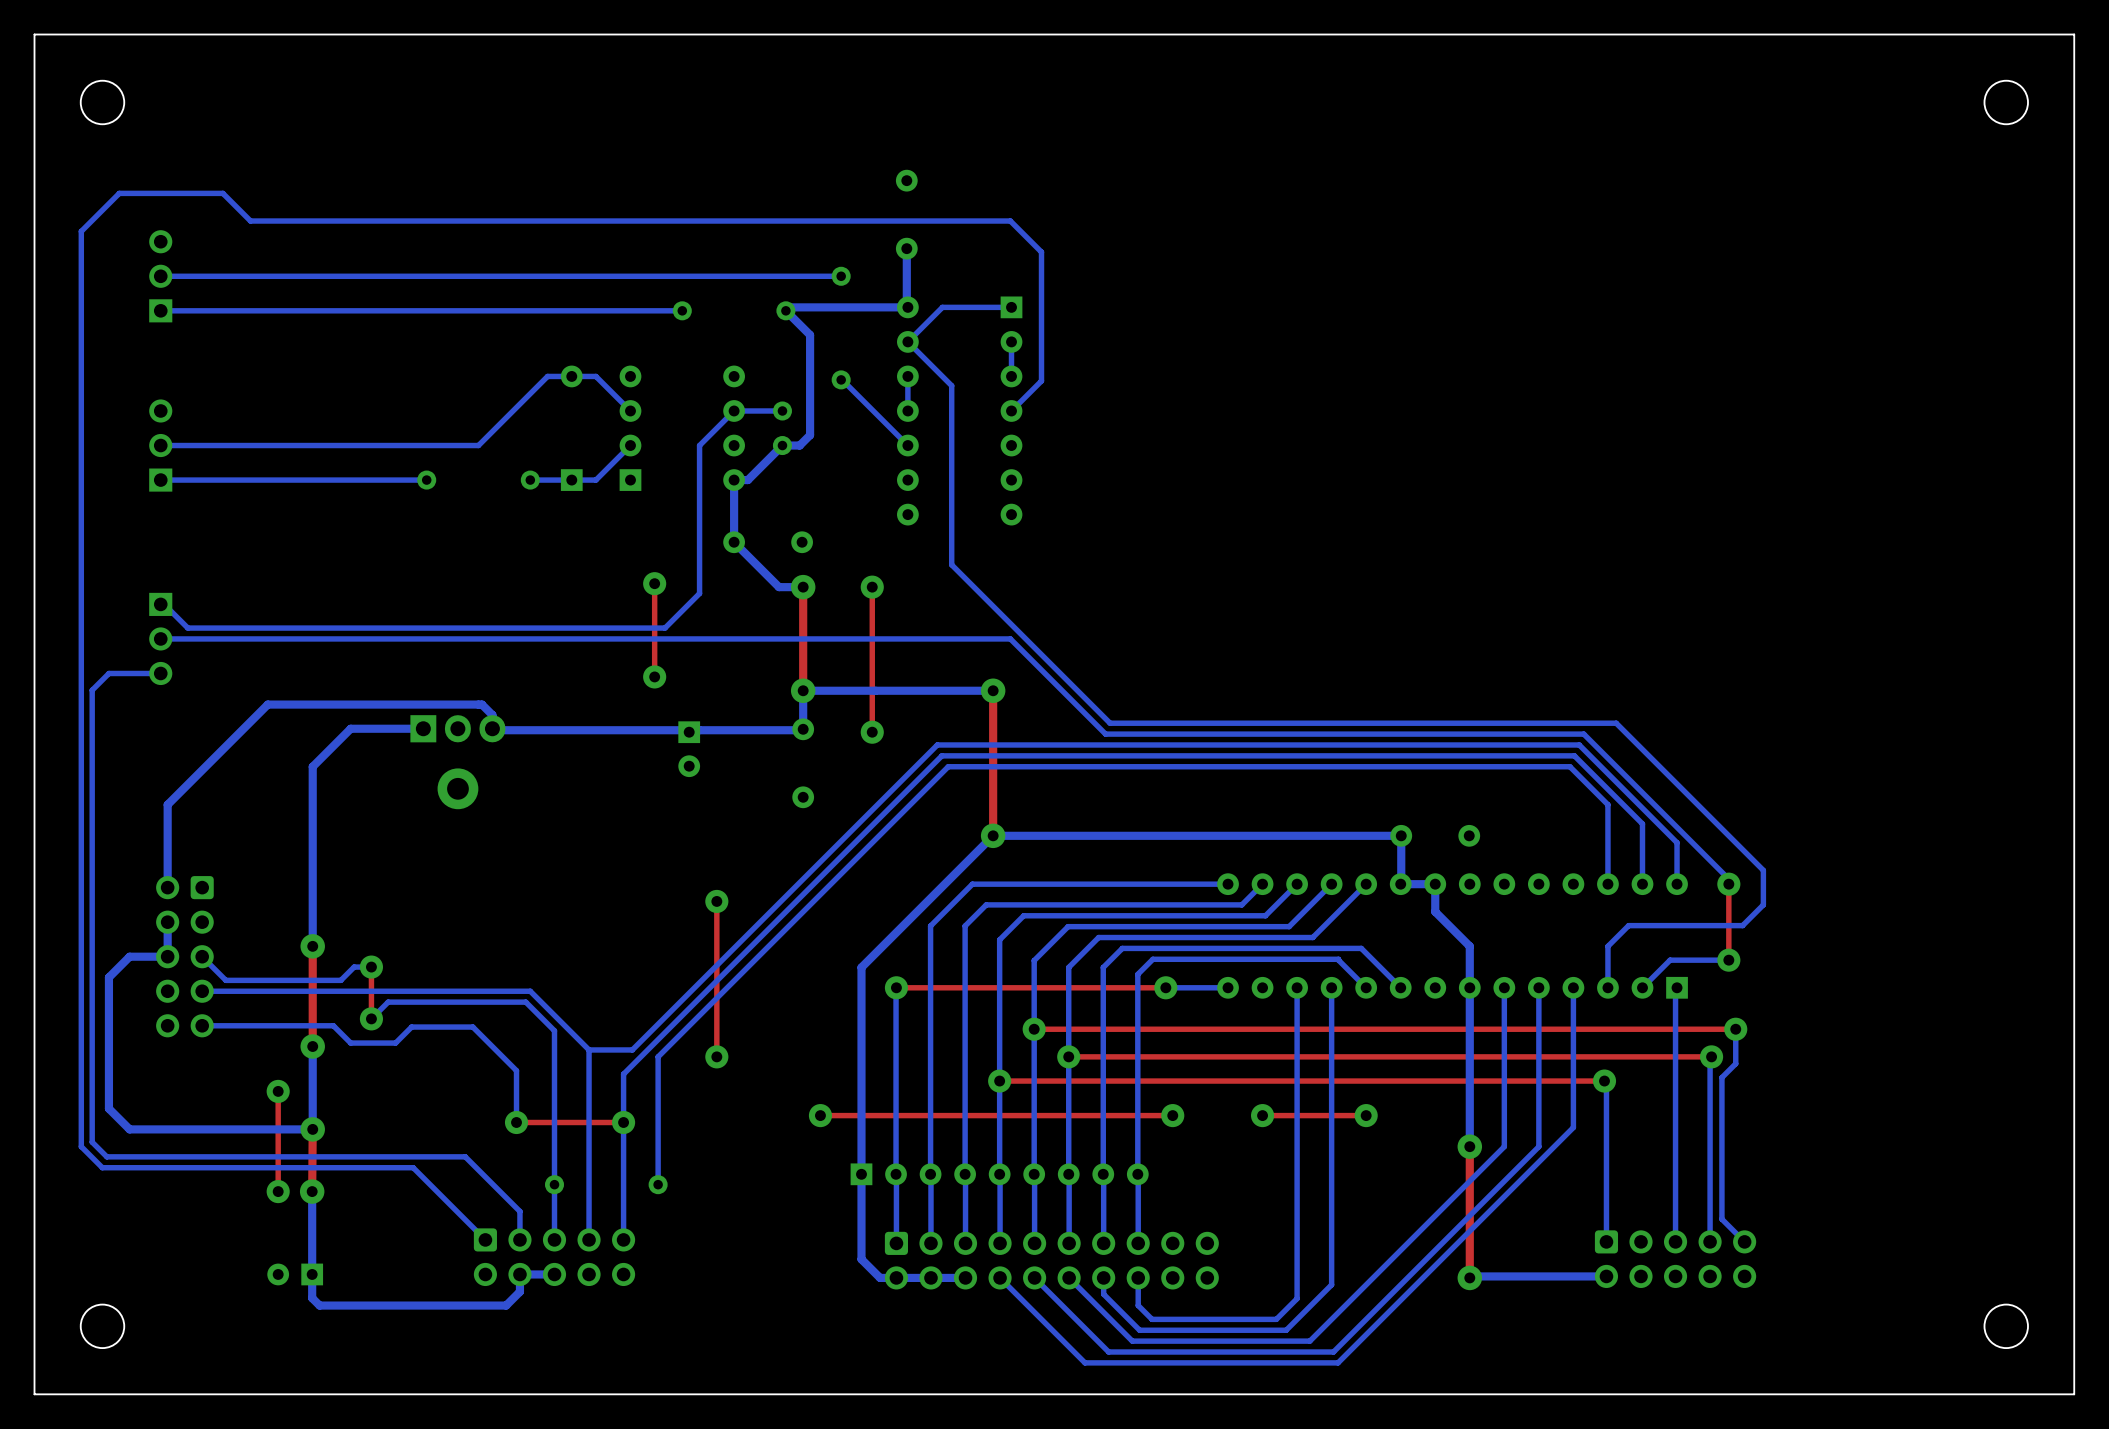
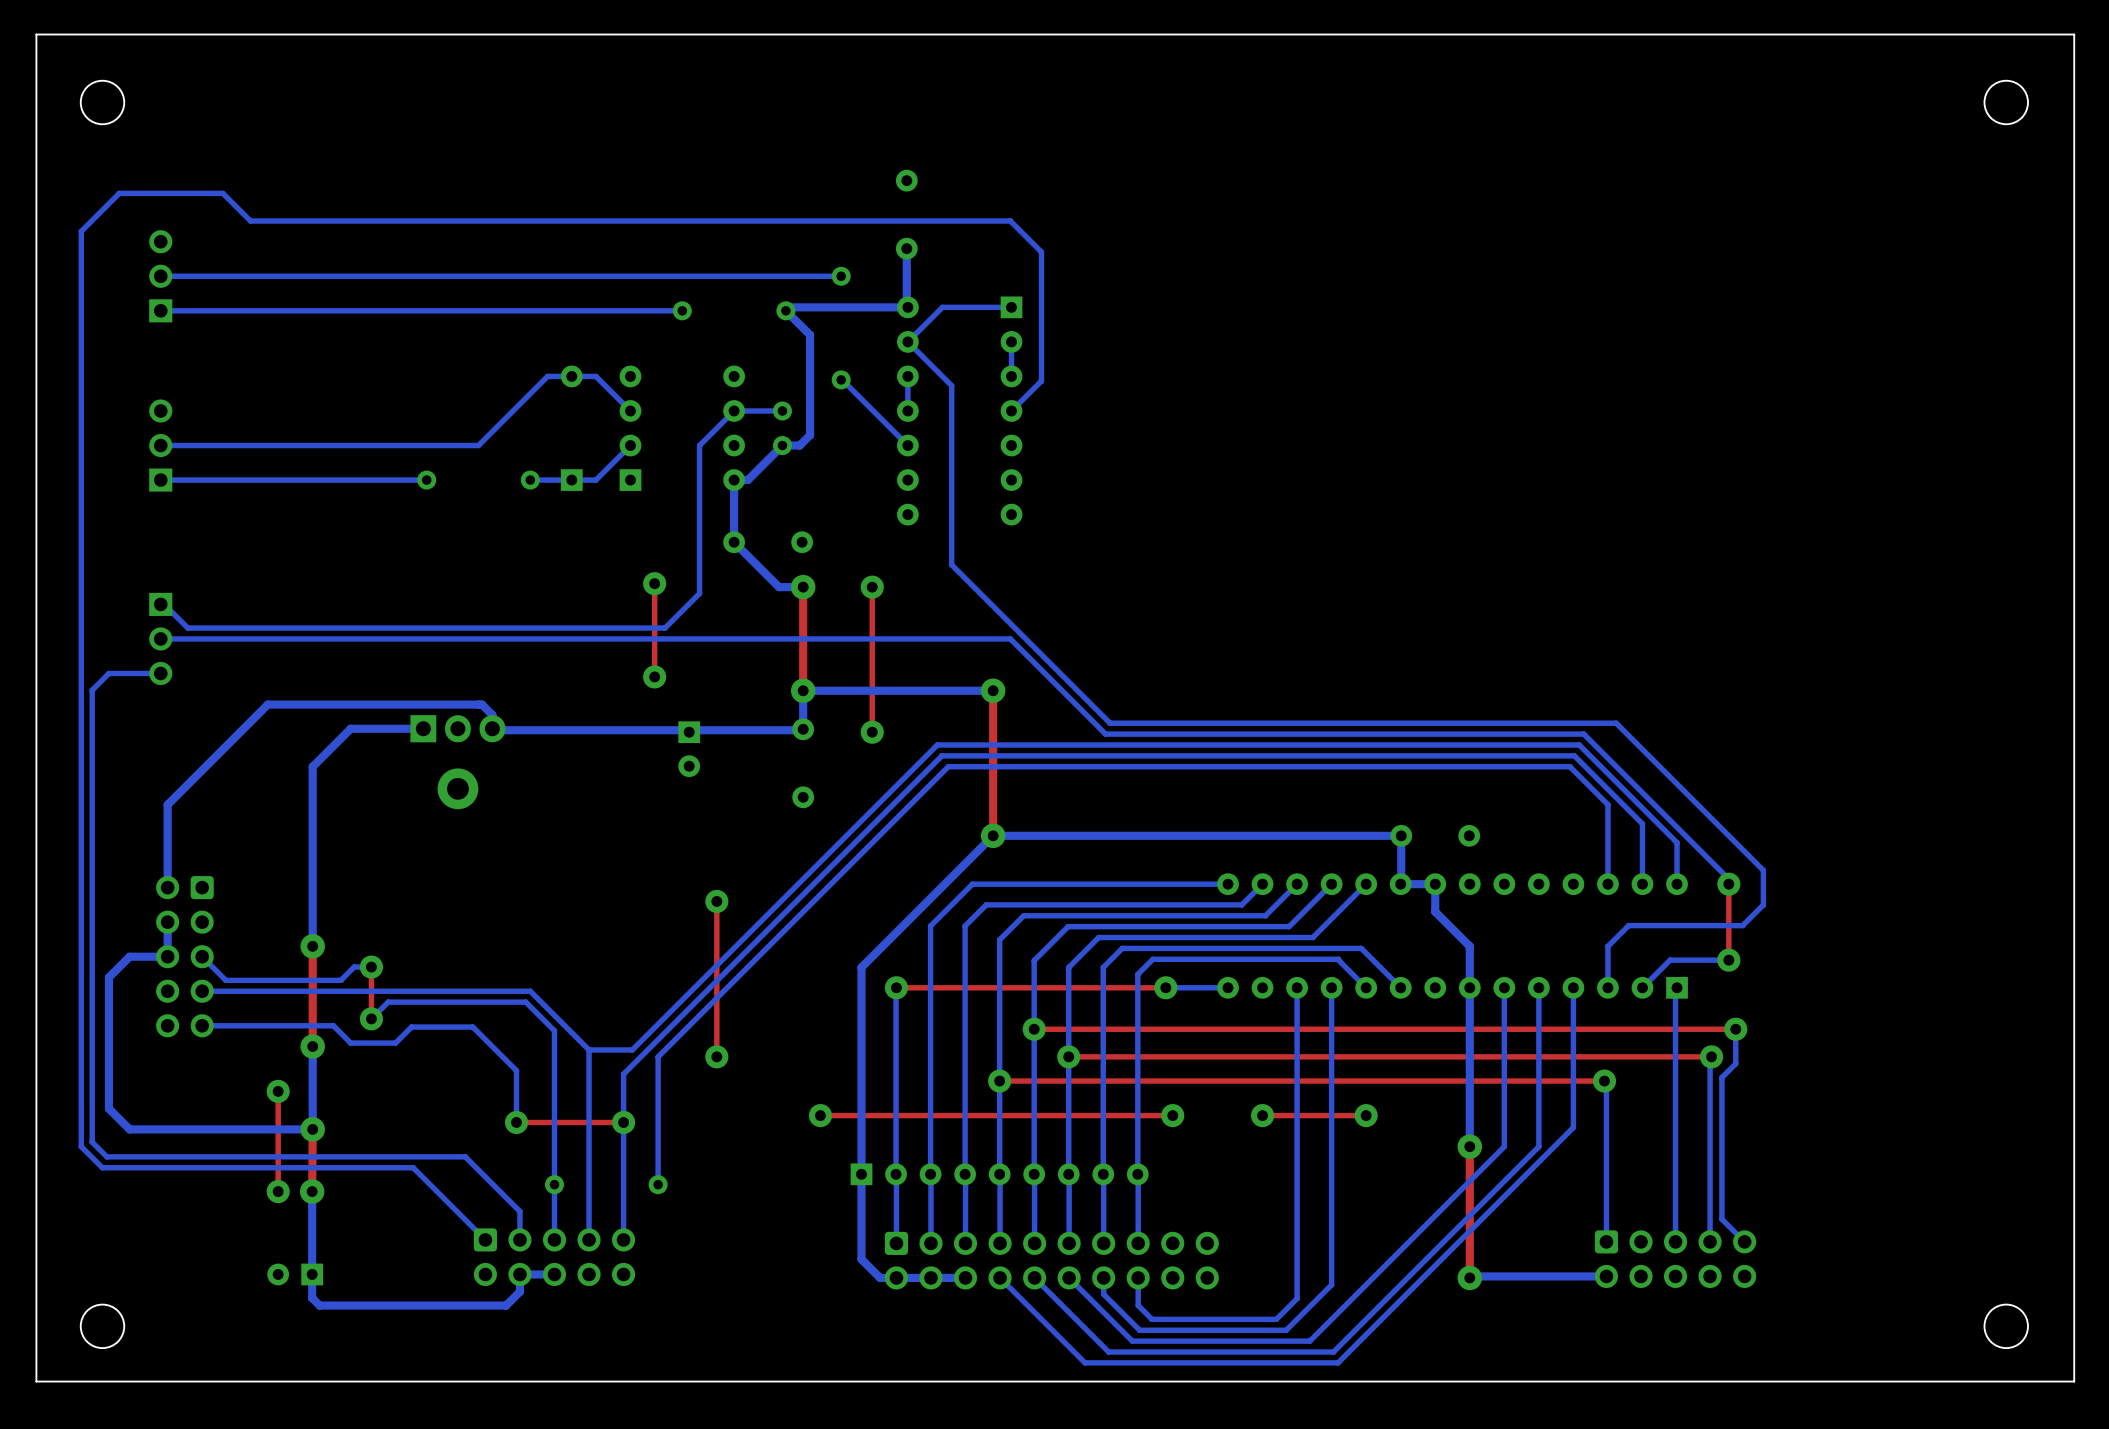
board edge: (36, 34) (34, 34) (34, 1394) (2074, 1394) (2074, 1381) -> (36, 34) (36, 1381) (2074, 1381)

